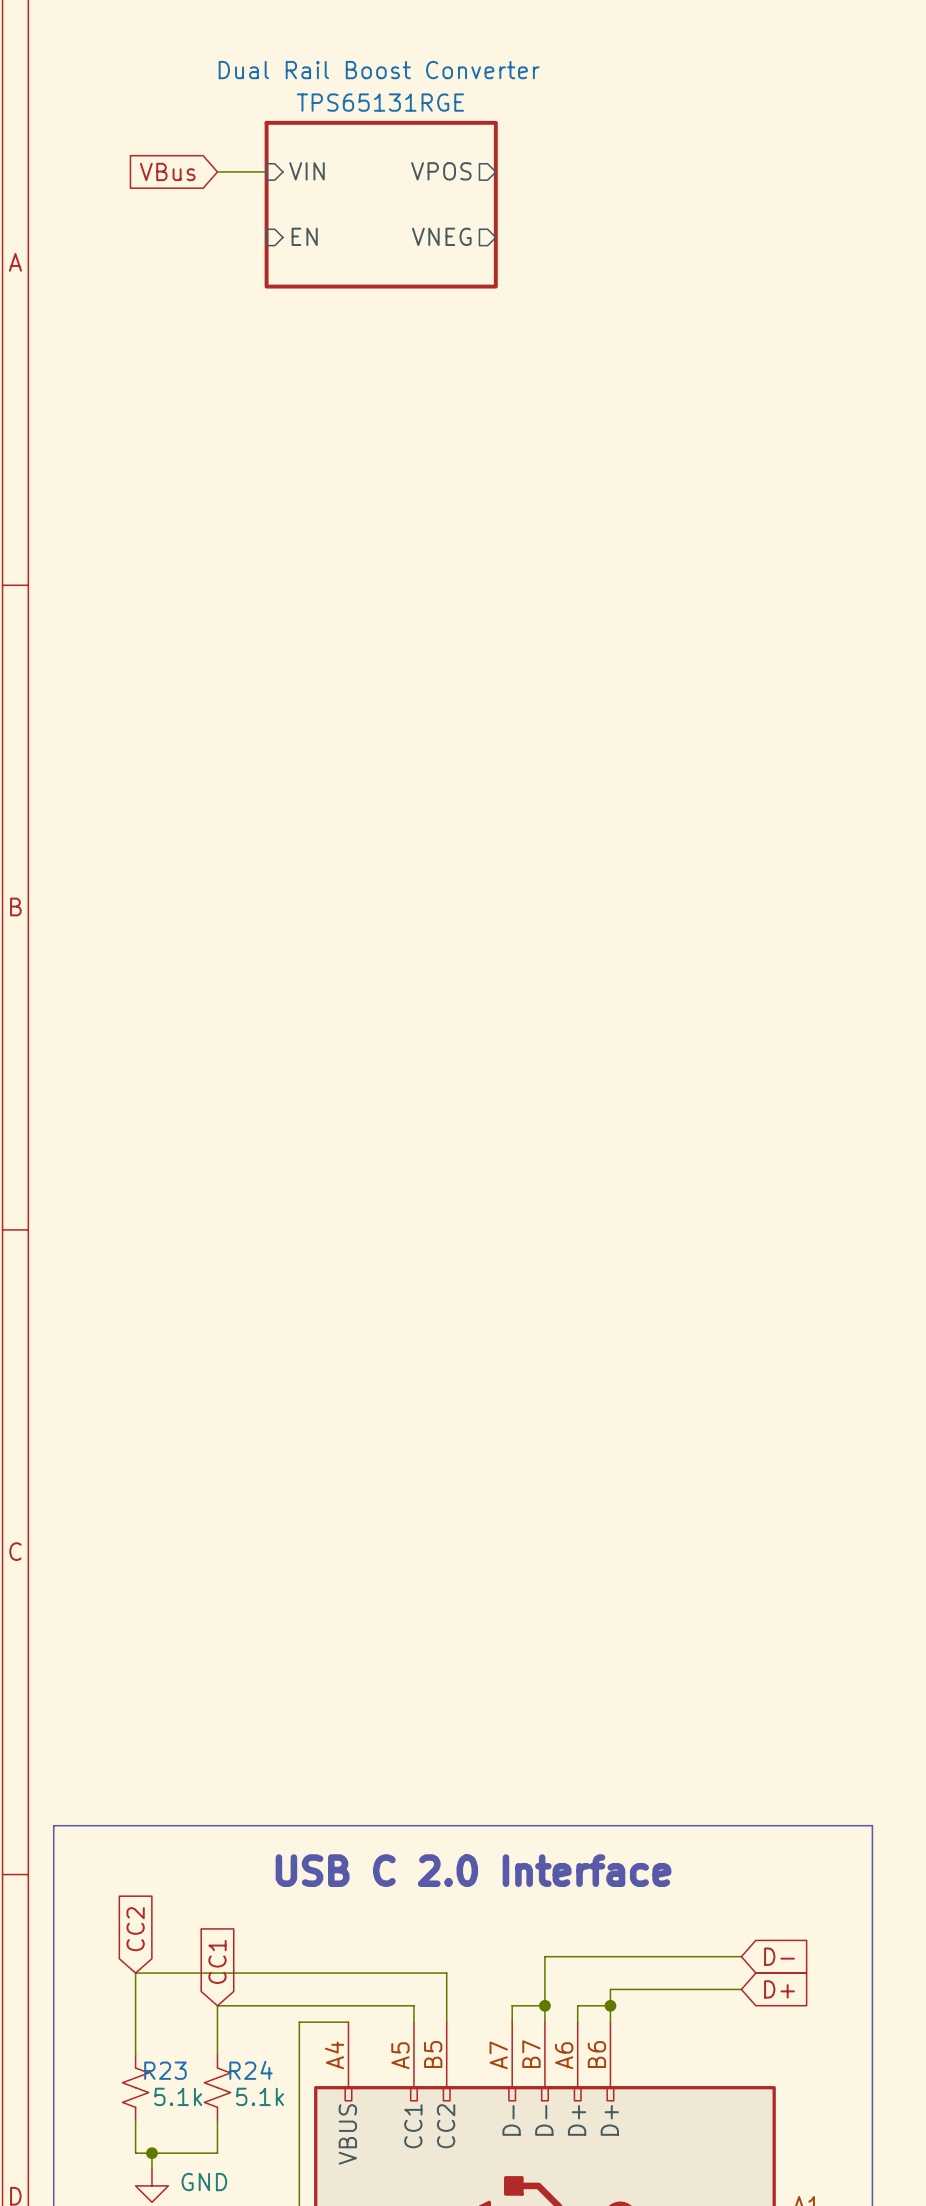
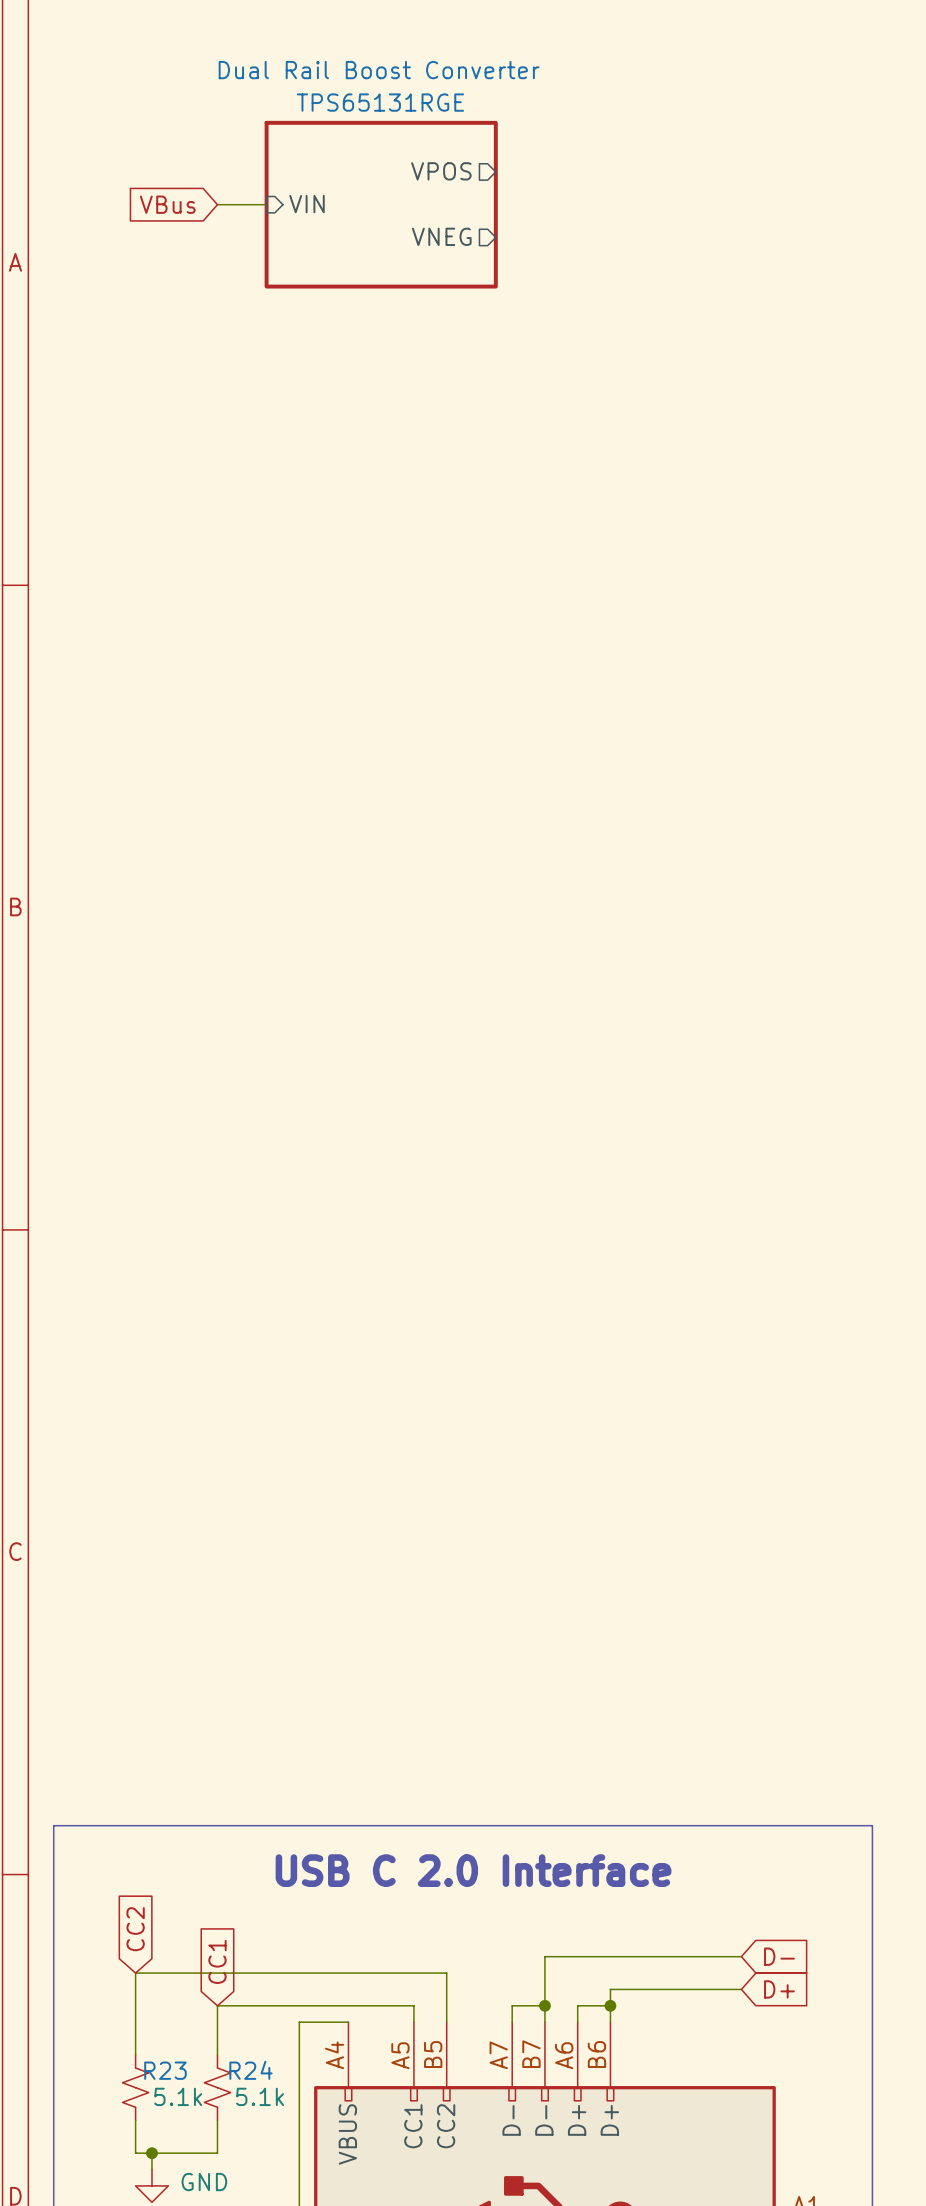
global label position: VBus (167, 171) -> VBus (167, 204)
wire: (217, 171) (266, 171) -> (217, 204) (266, 204)
sheet pin position: VIN (307, 171) -> VIN (307, 204)
sheet pin: EN (304, 236) -> none

